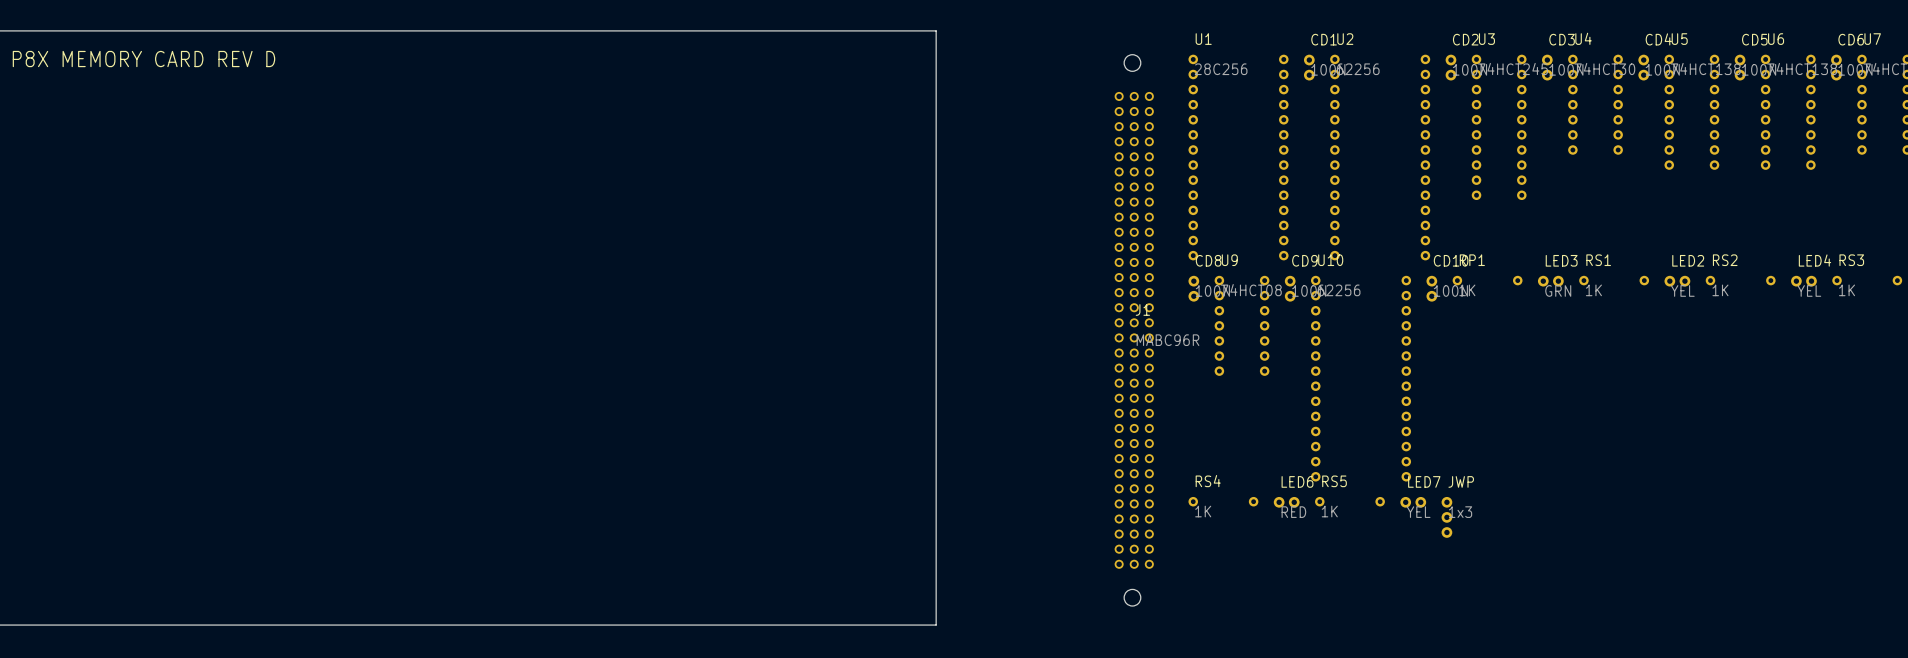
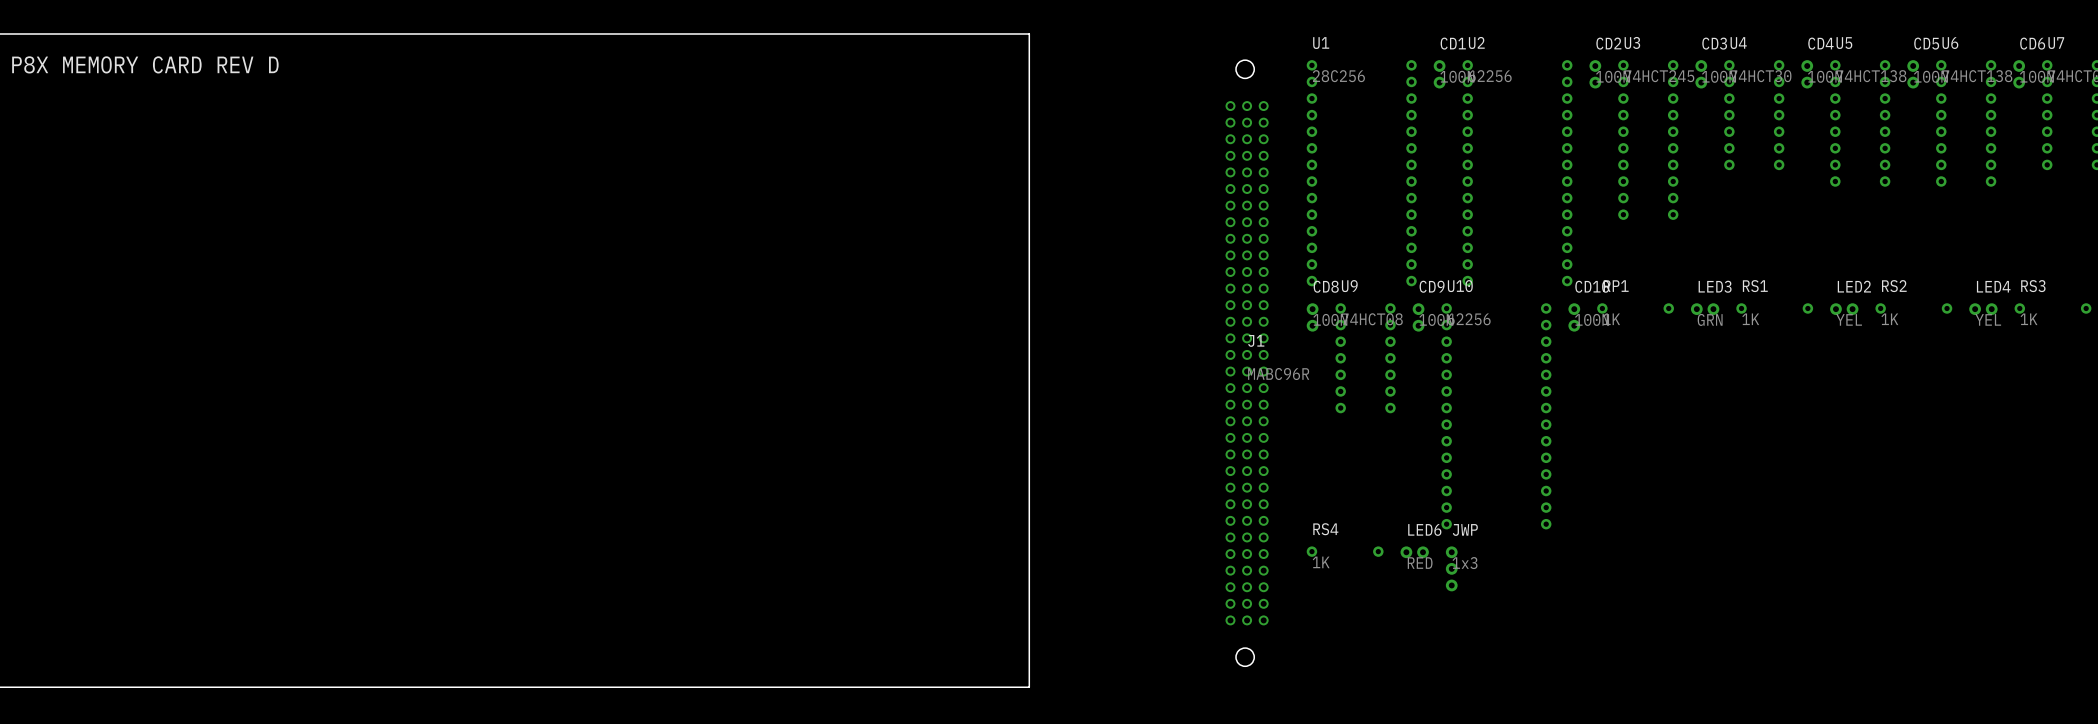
RS5: 1K (1349, 501) -> none
LED7: YEL (1413, 502) -> none
JWP position: (1446, 517) -> (1451, 568)

